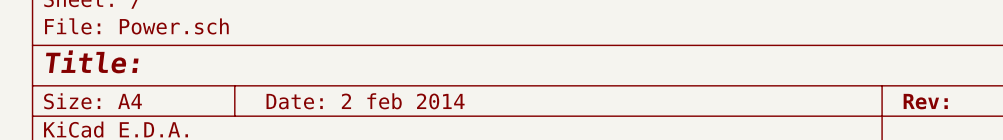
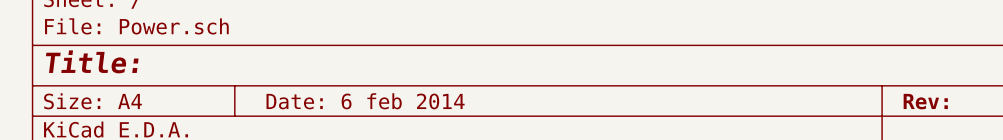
title block: Date: 2 feb 2014 (365, 101) -> Date: 6 feb 2014 (365, 101)

